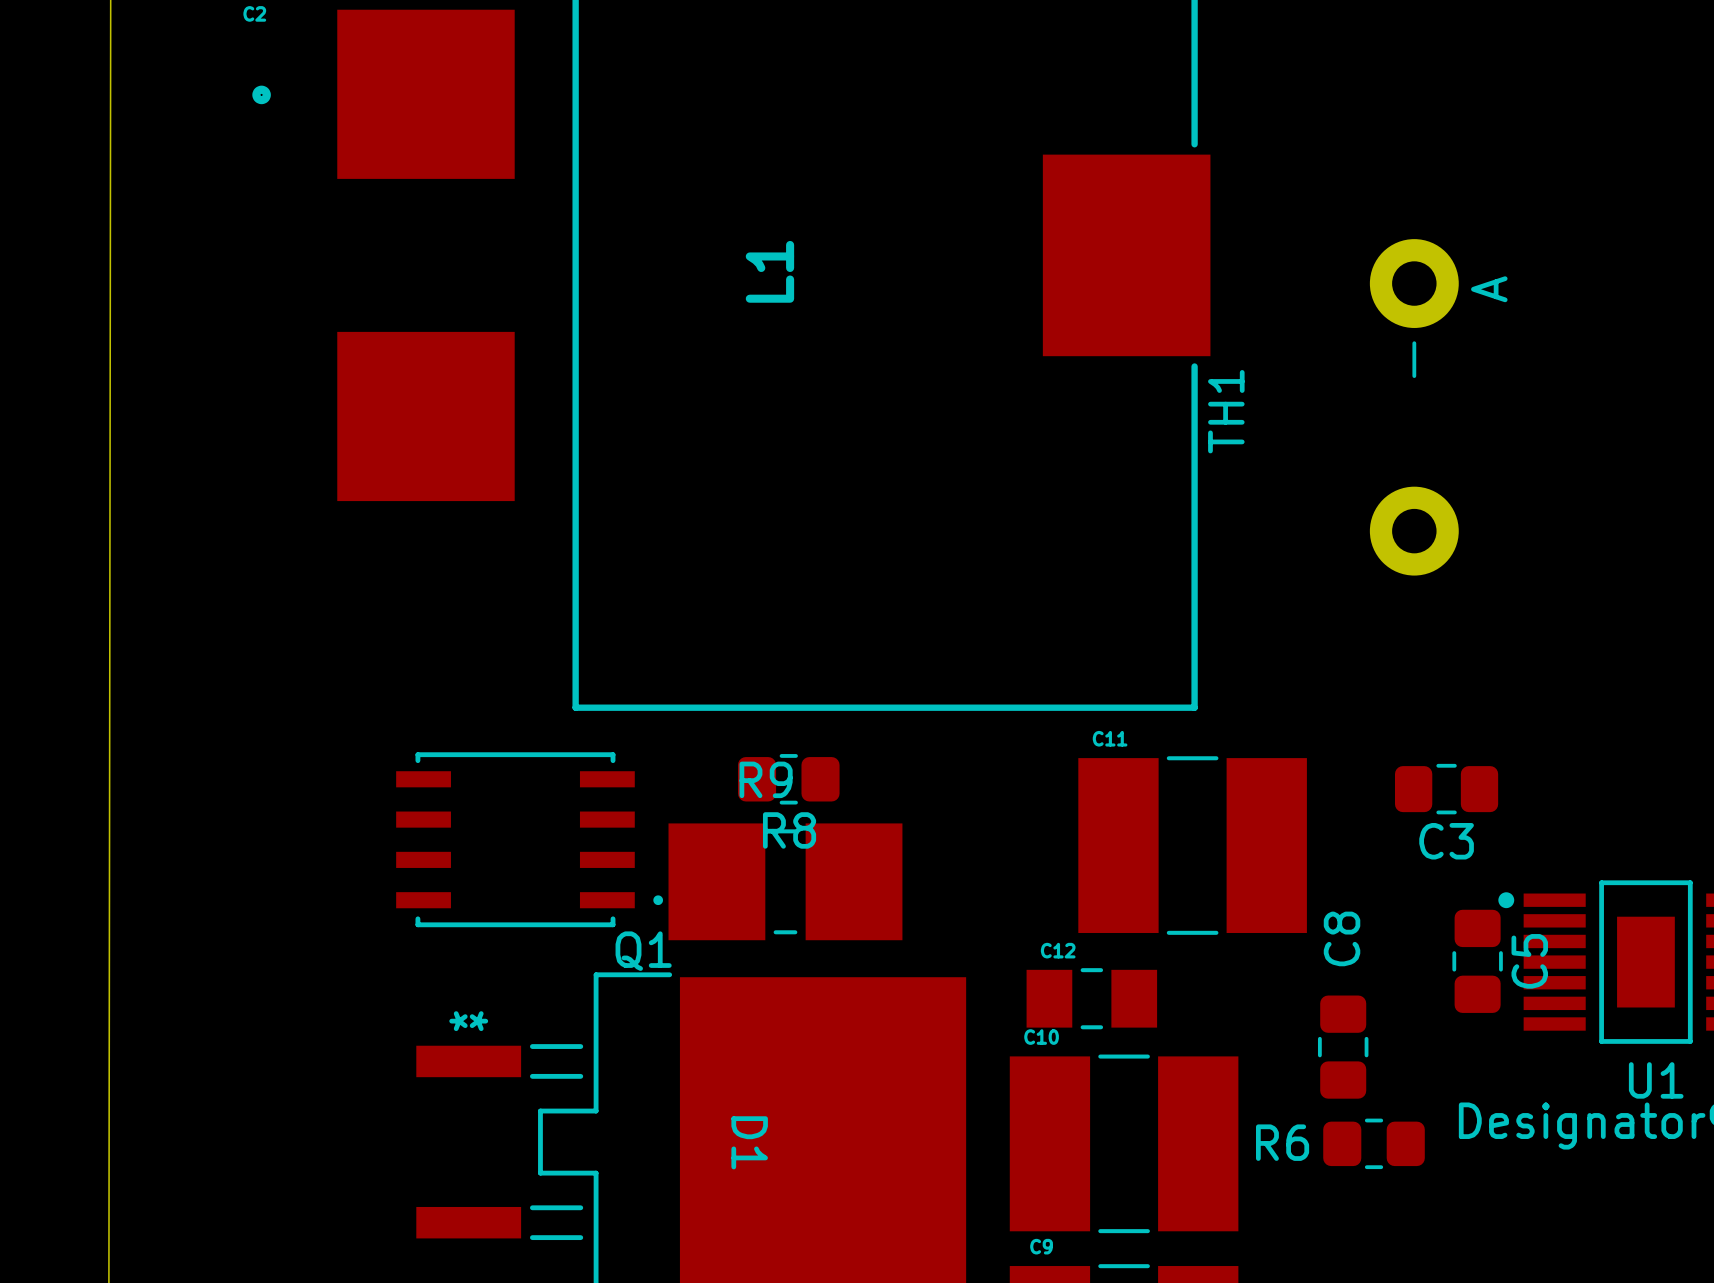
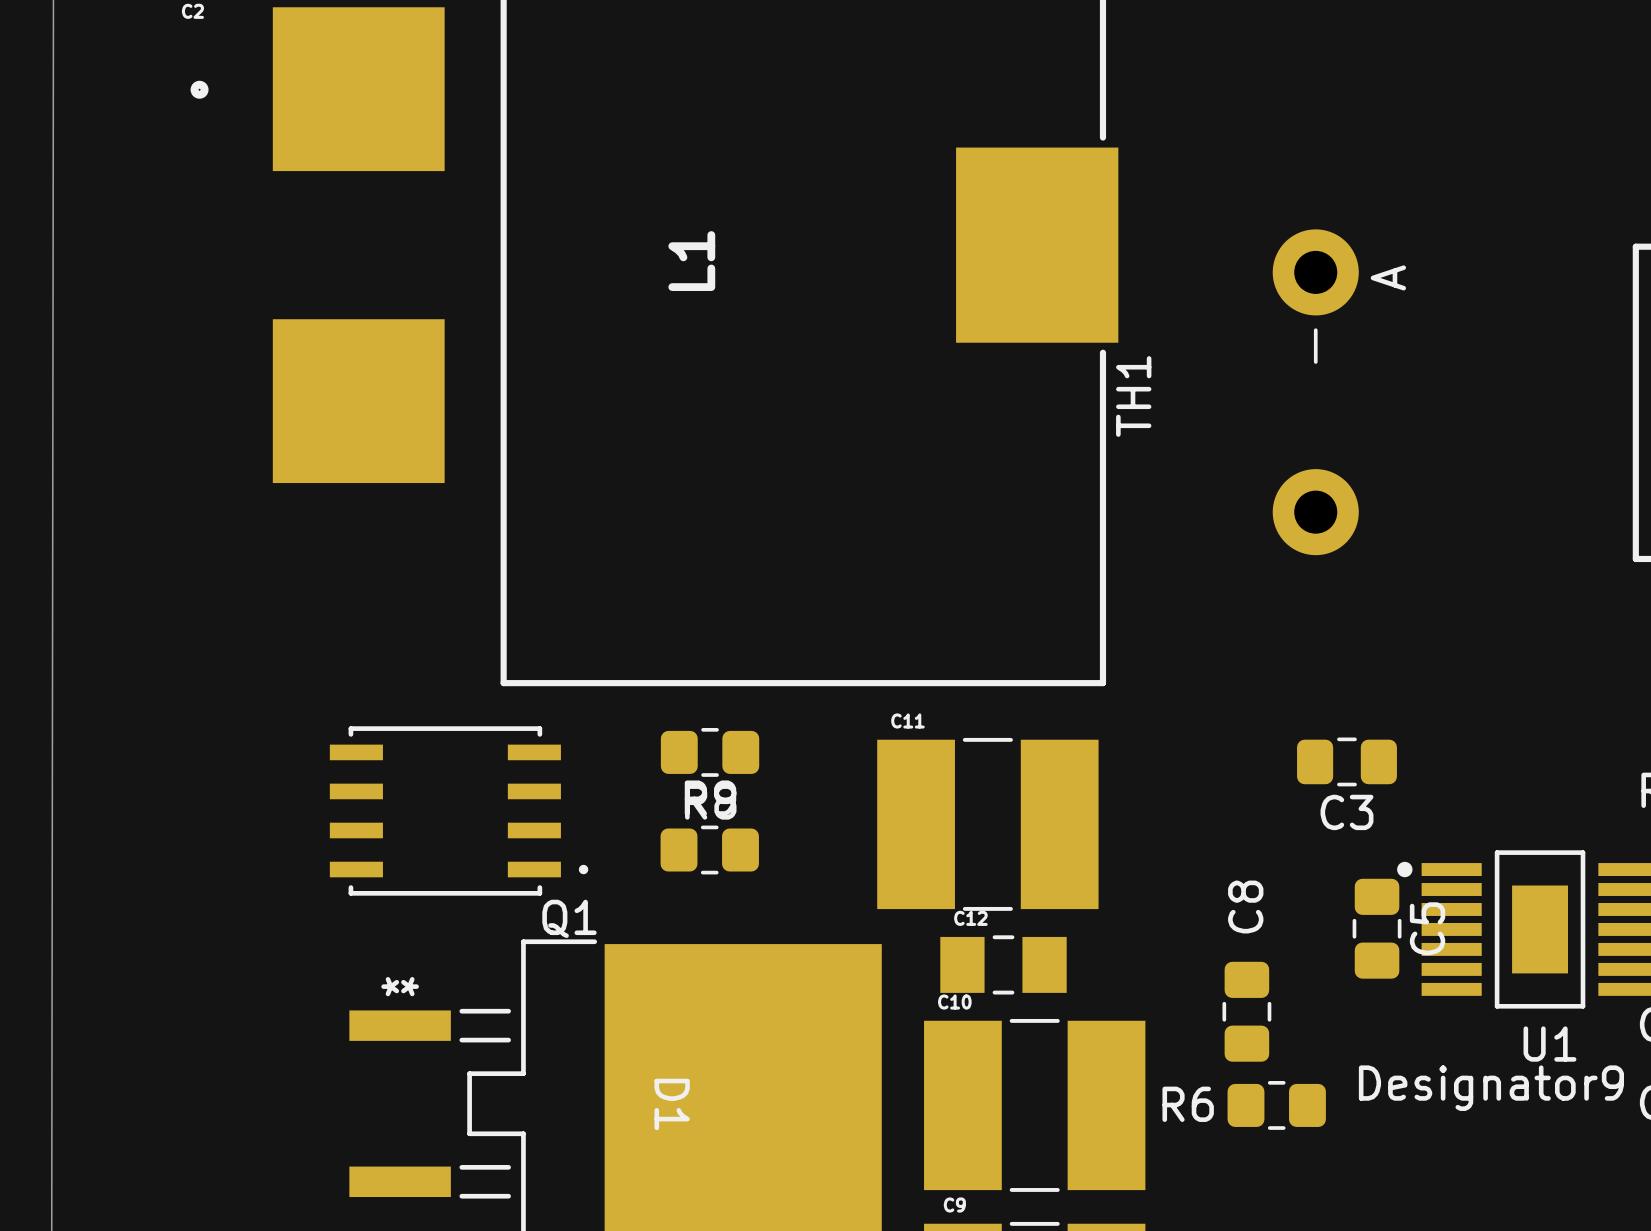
R9 footprint: [668, 823, 903, 941] -> [660, 825, 759, 875]
C11 position: (1192, 845) -> (987, 824)

